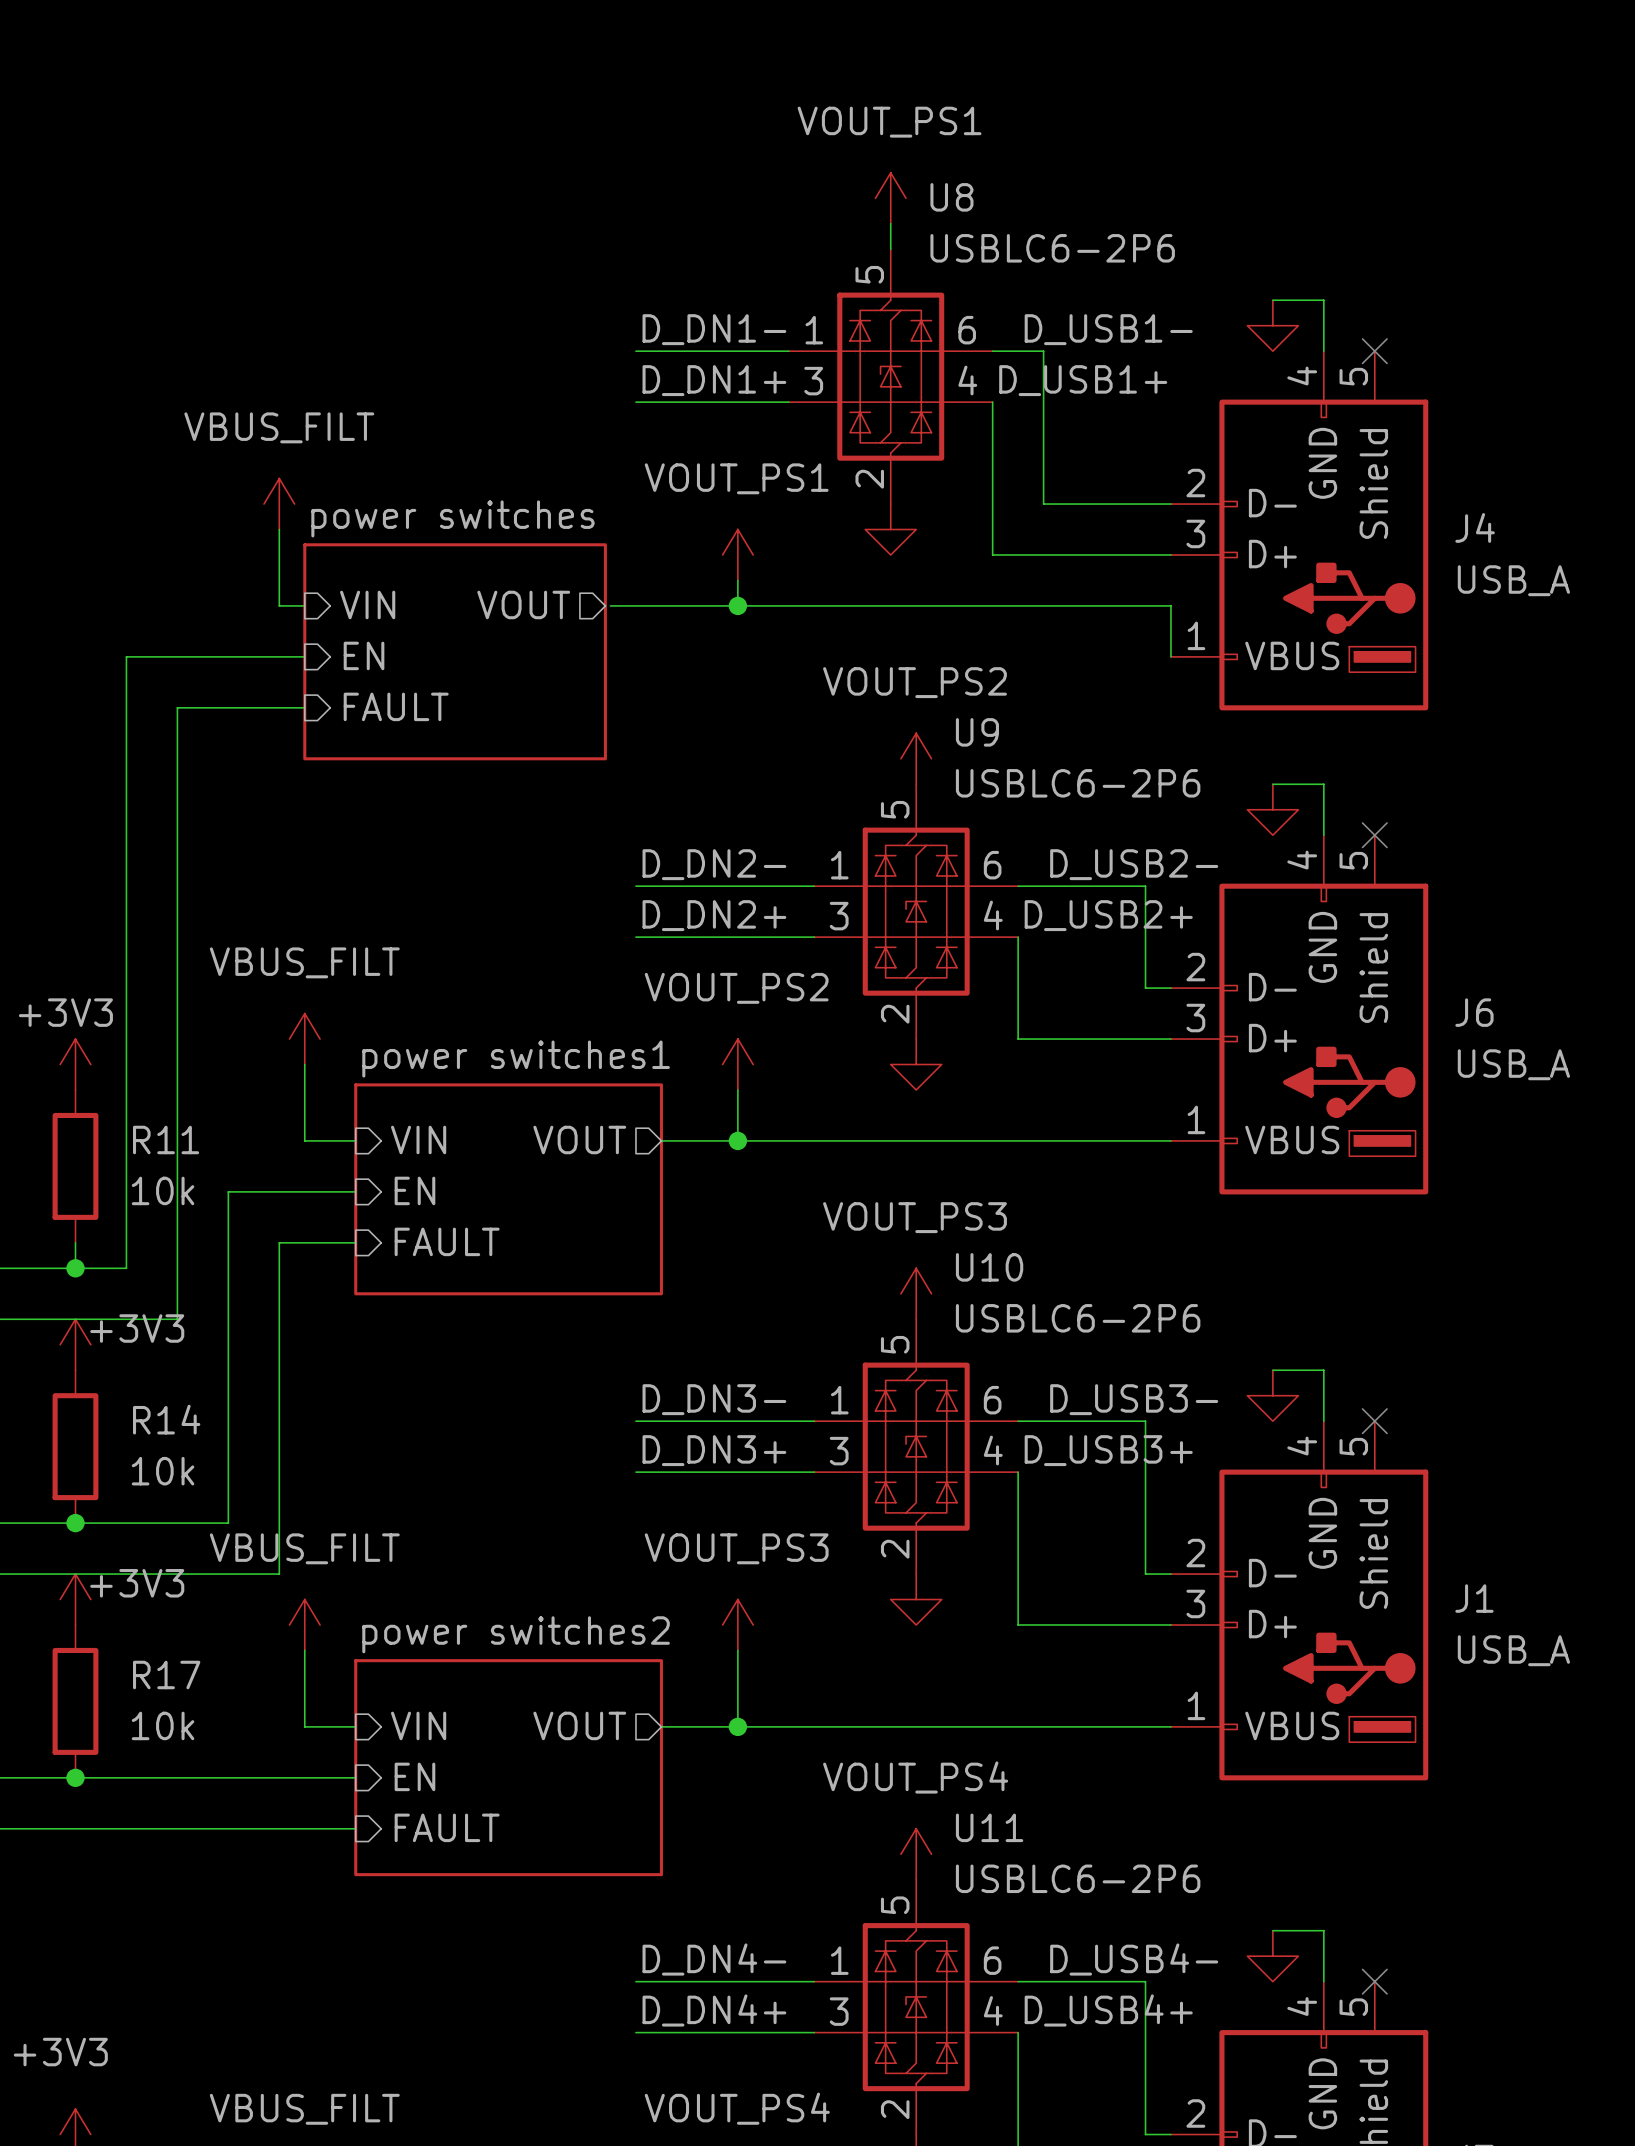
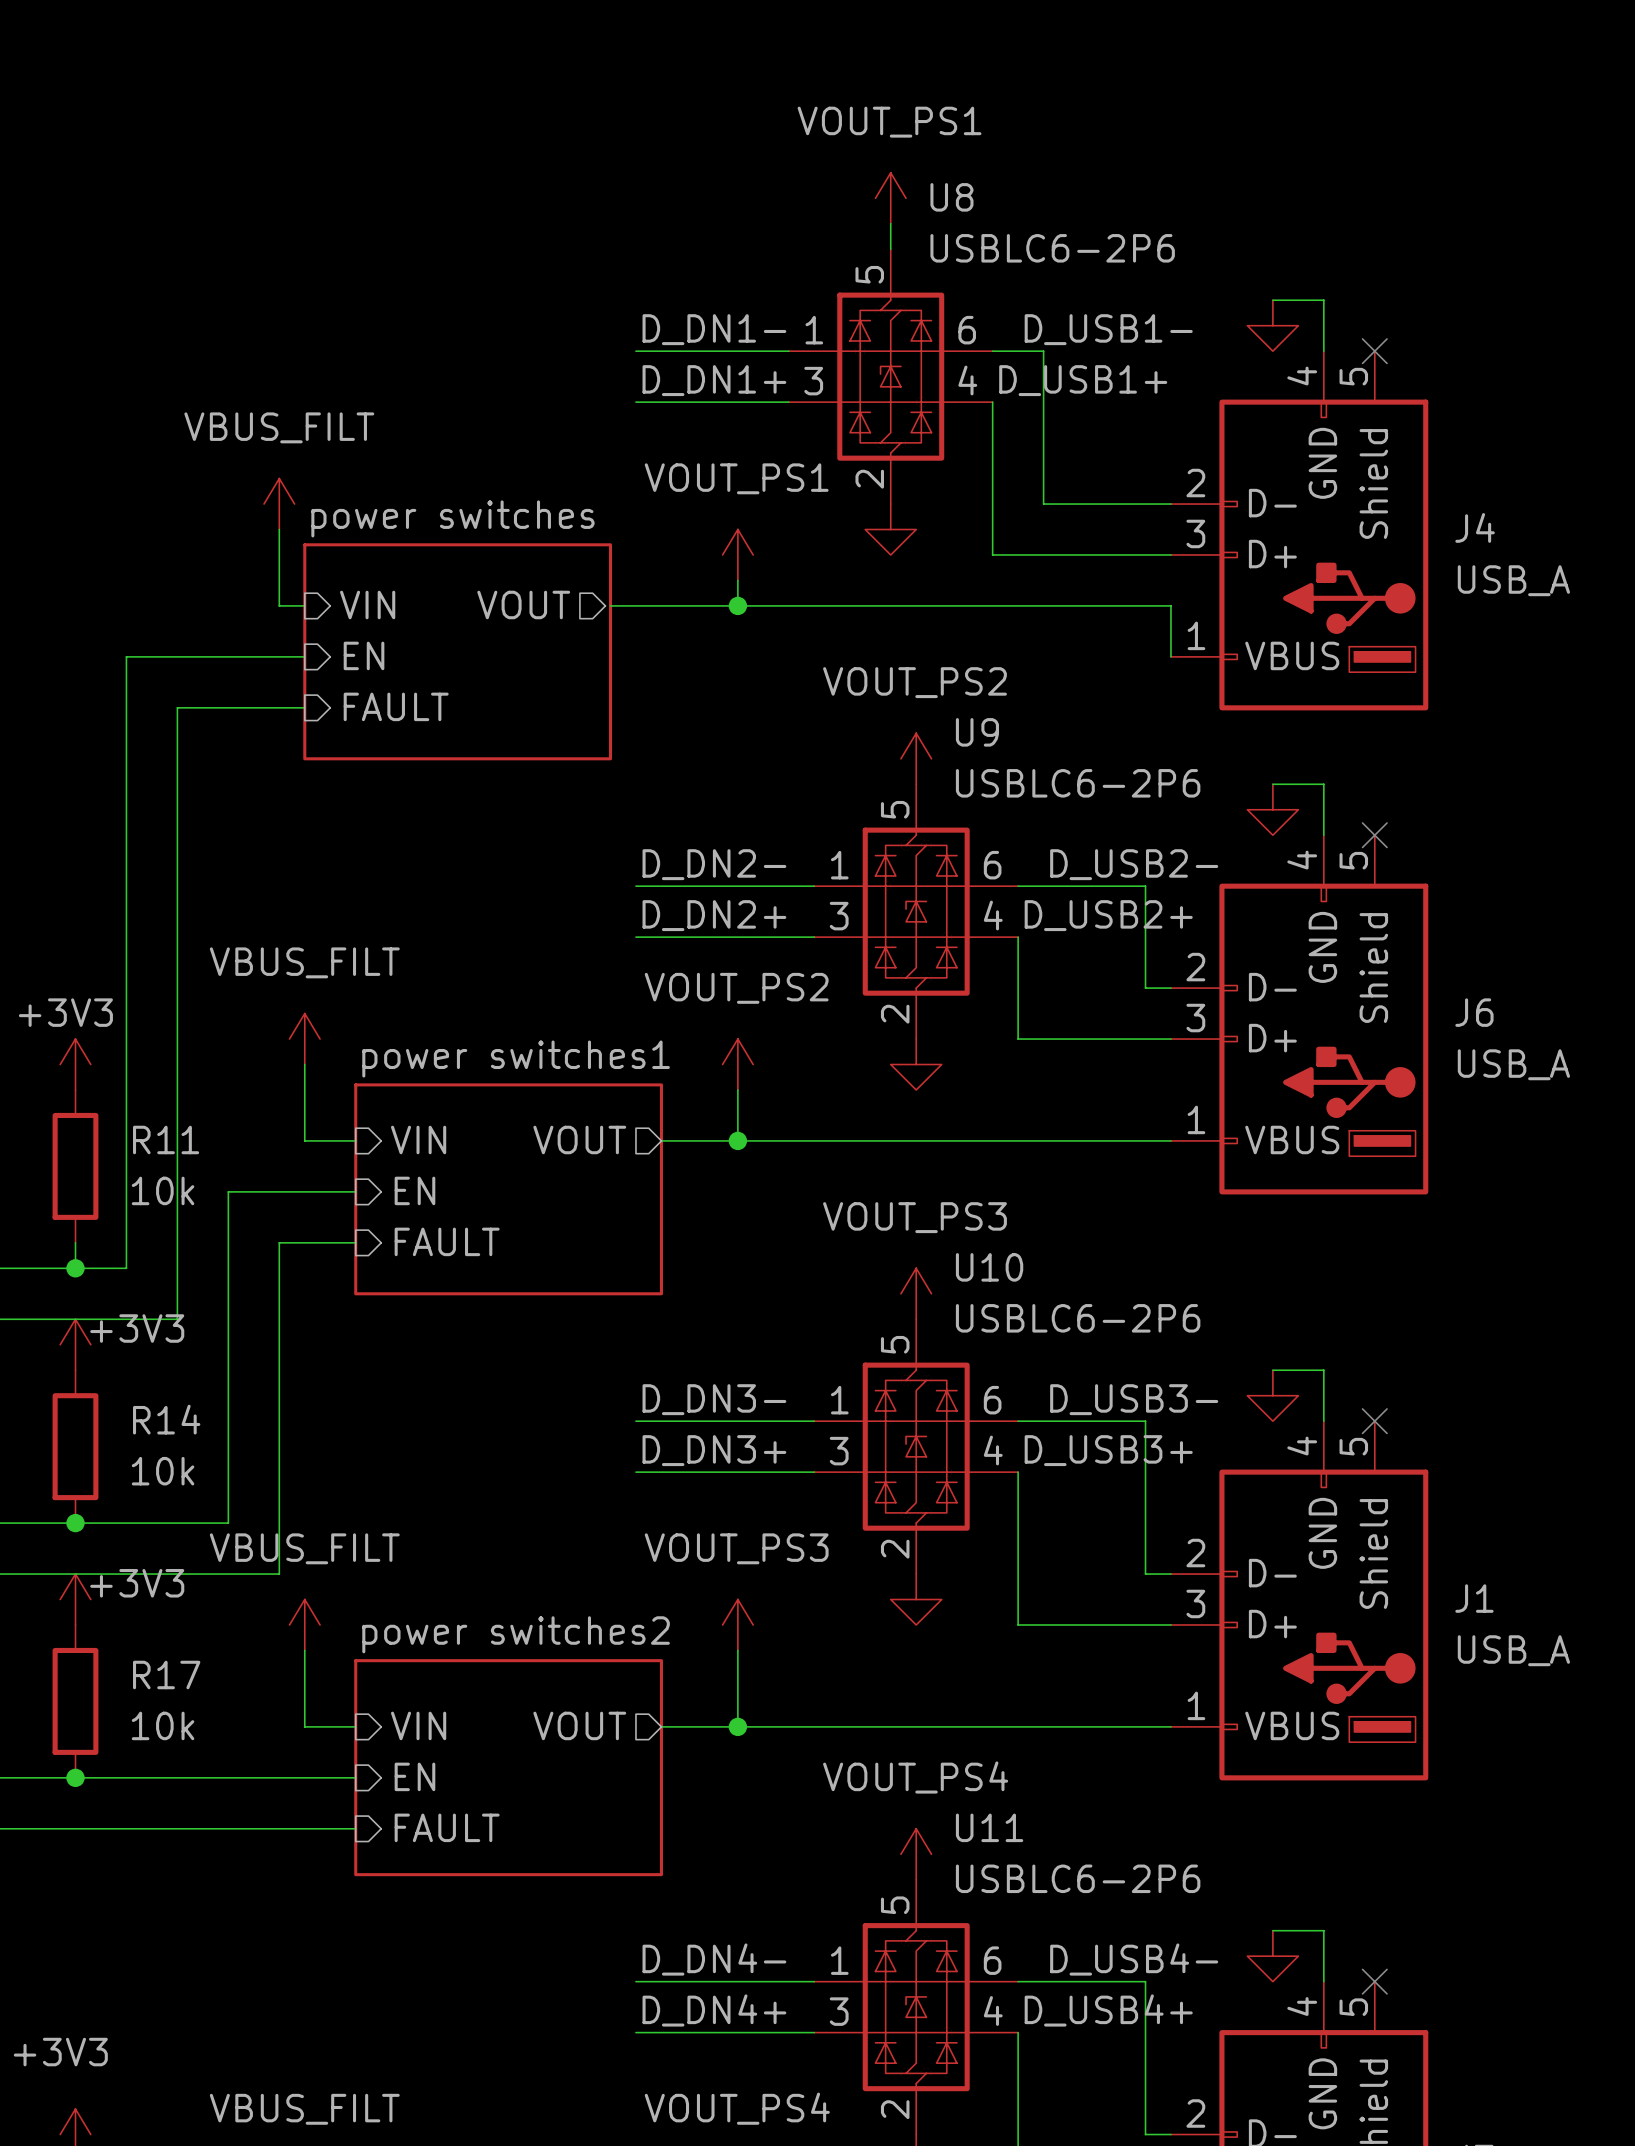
sheet power switches shape: [303, 543, 607, 761] -> [303, 543, 613, 761]

